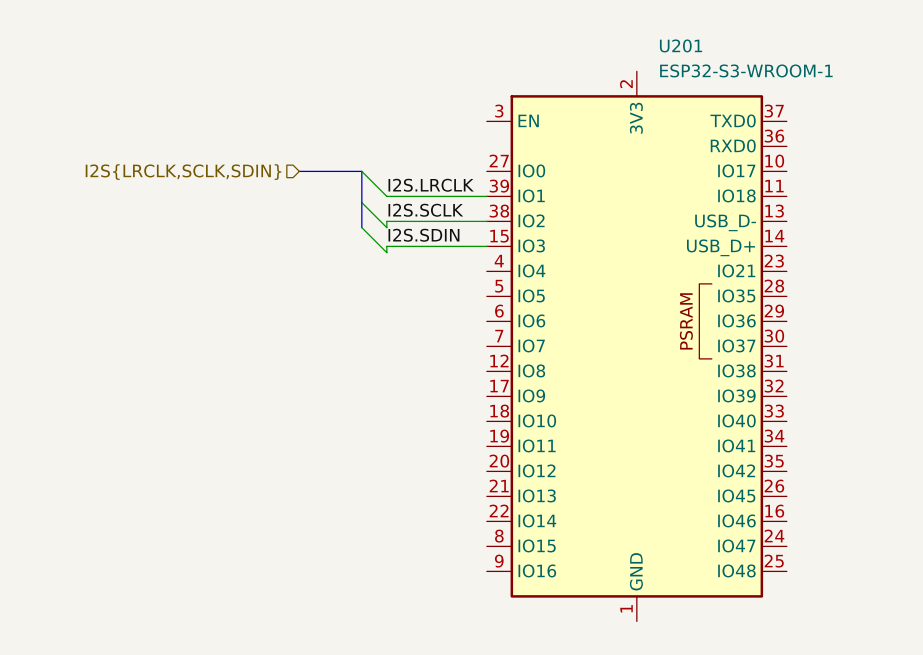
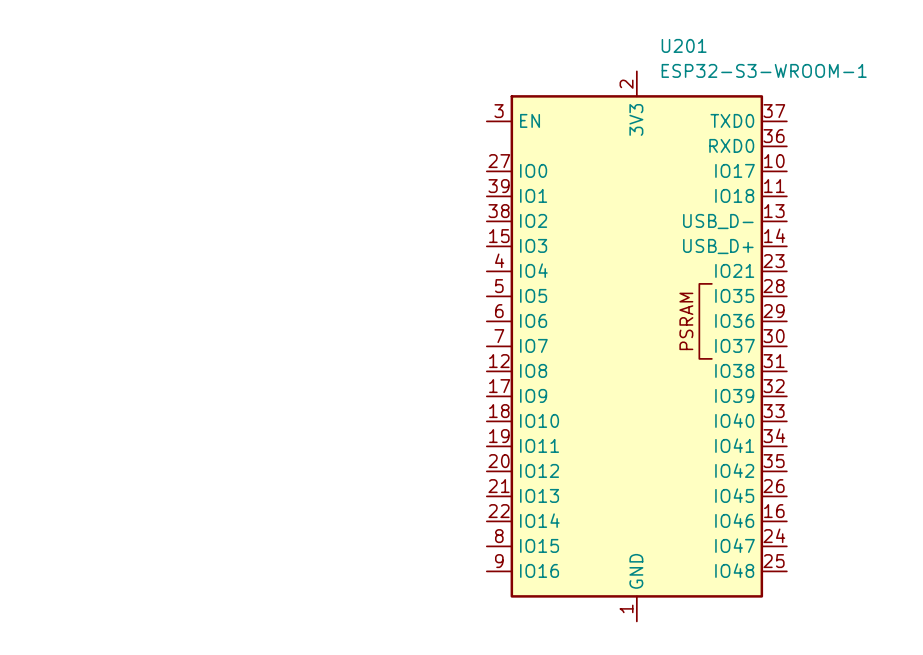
bus: (299, 171) (361, 171) (361, 227) -> none
wire: (361, 171) (386, 196) (486, 196) -> none
hierarchical label: I2S{LRCLK,SCLK,SDIN} (183, 172) -> none
label: I2S.LRCLK (431, 185) -> none
wire: (361, 202) (386, 227) (386, 221) (486, 221) -> none
label: I2S.SCLK (425, 210) -> none
wire: (361, 227) (386, 252) -> none
label: I2S.SDIN (423, 235) -> none
wire: (486, 246) (386, 246) (386, 252) -> none

